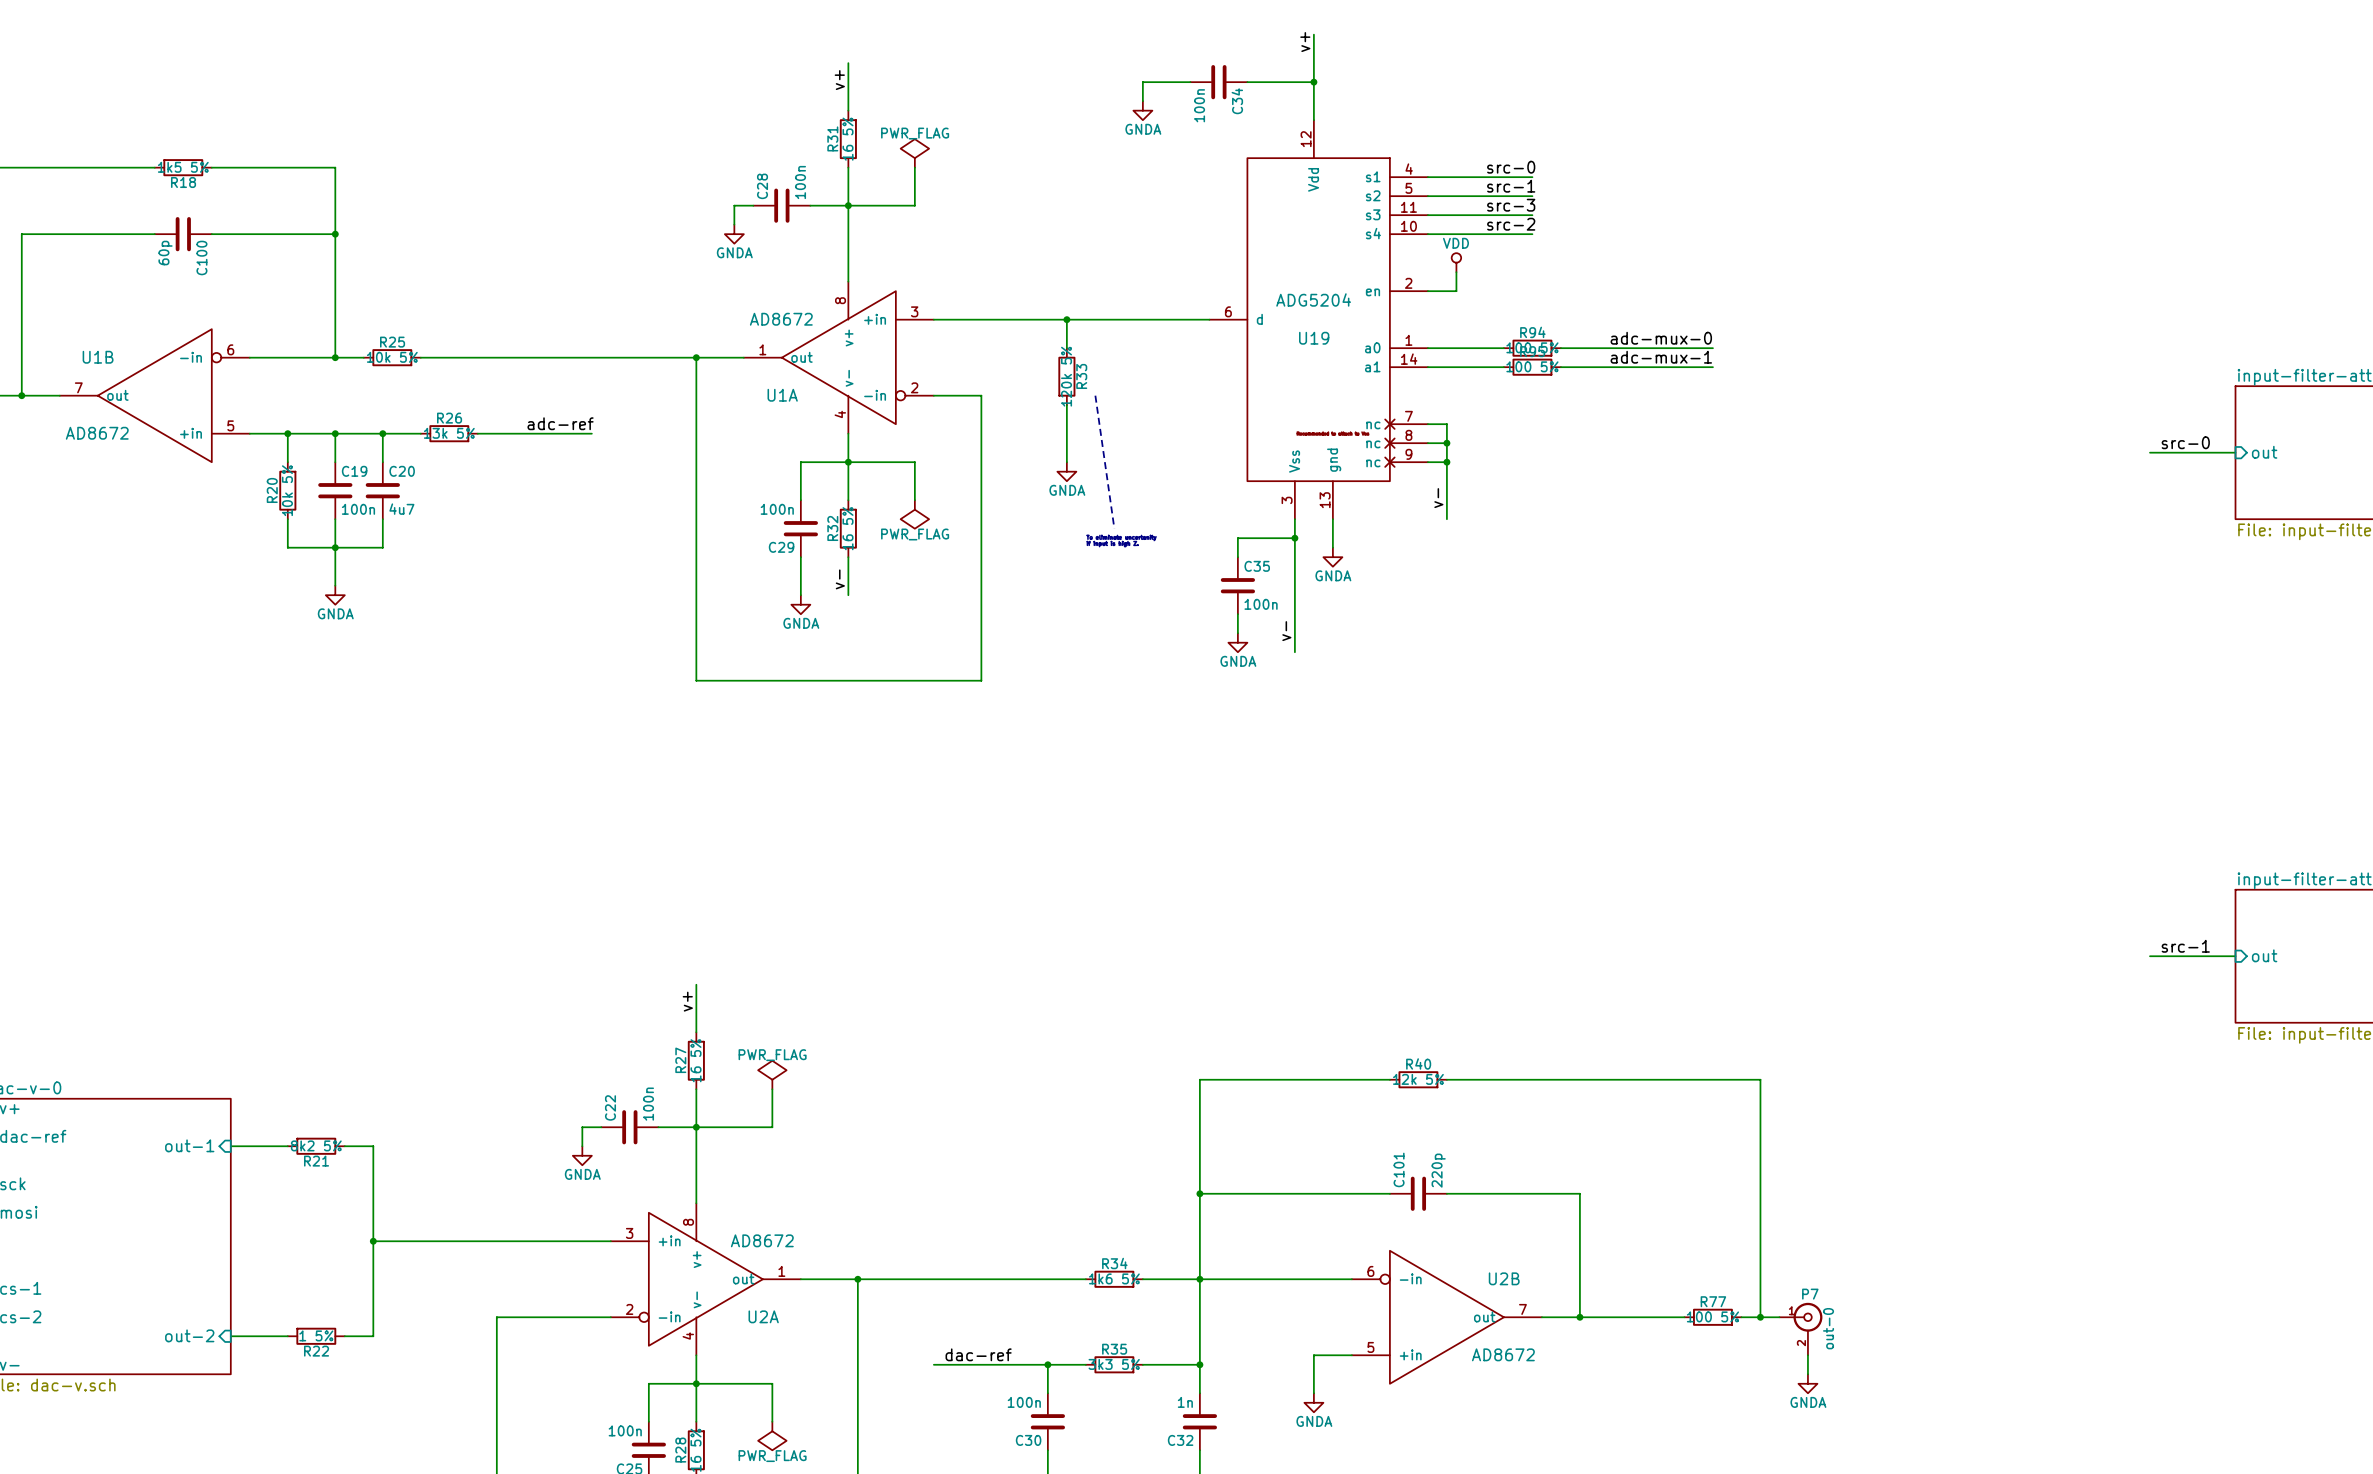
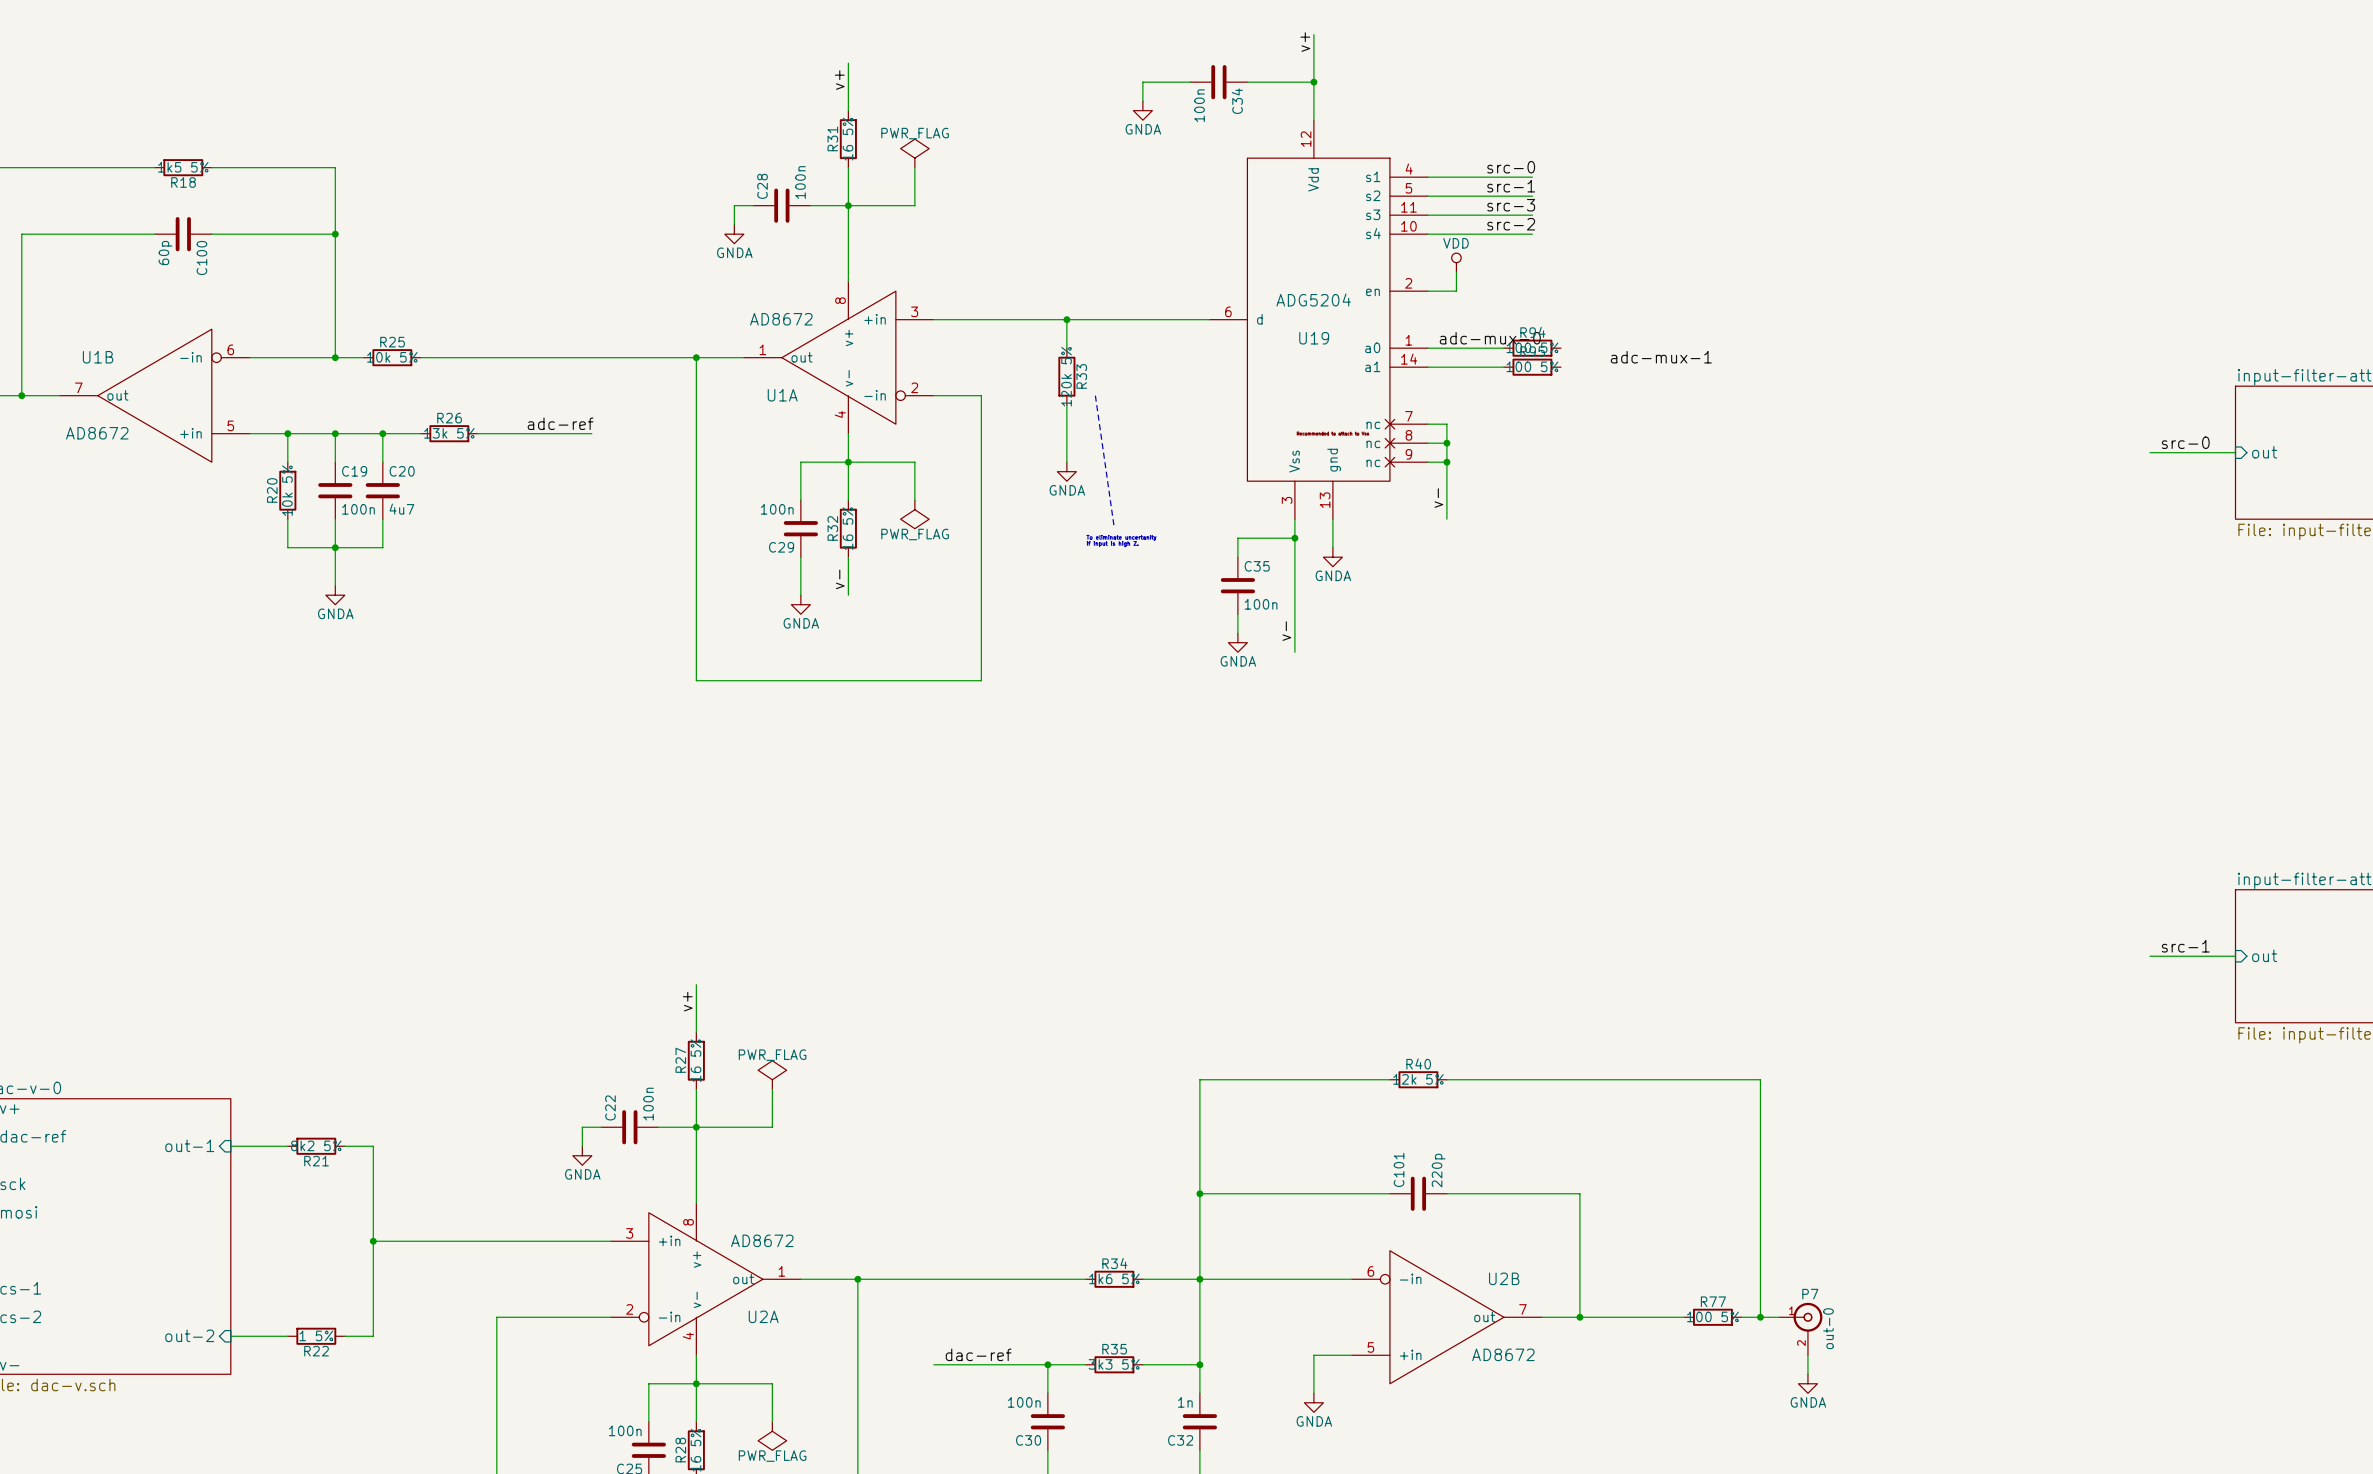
label position: adc-mux-0 (1661, 338) -> adc-mux-0 (1490, 338)
wire: (1560, 348) (1712, 348) -> none
wire: (1560, 367) (1712, 367) -> none

